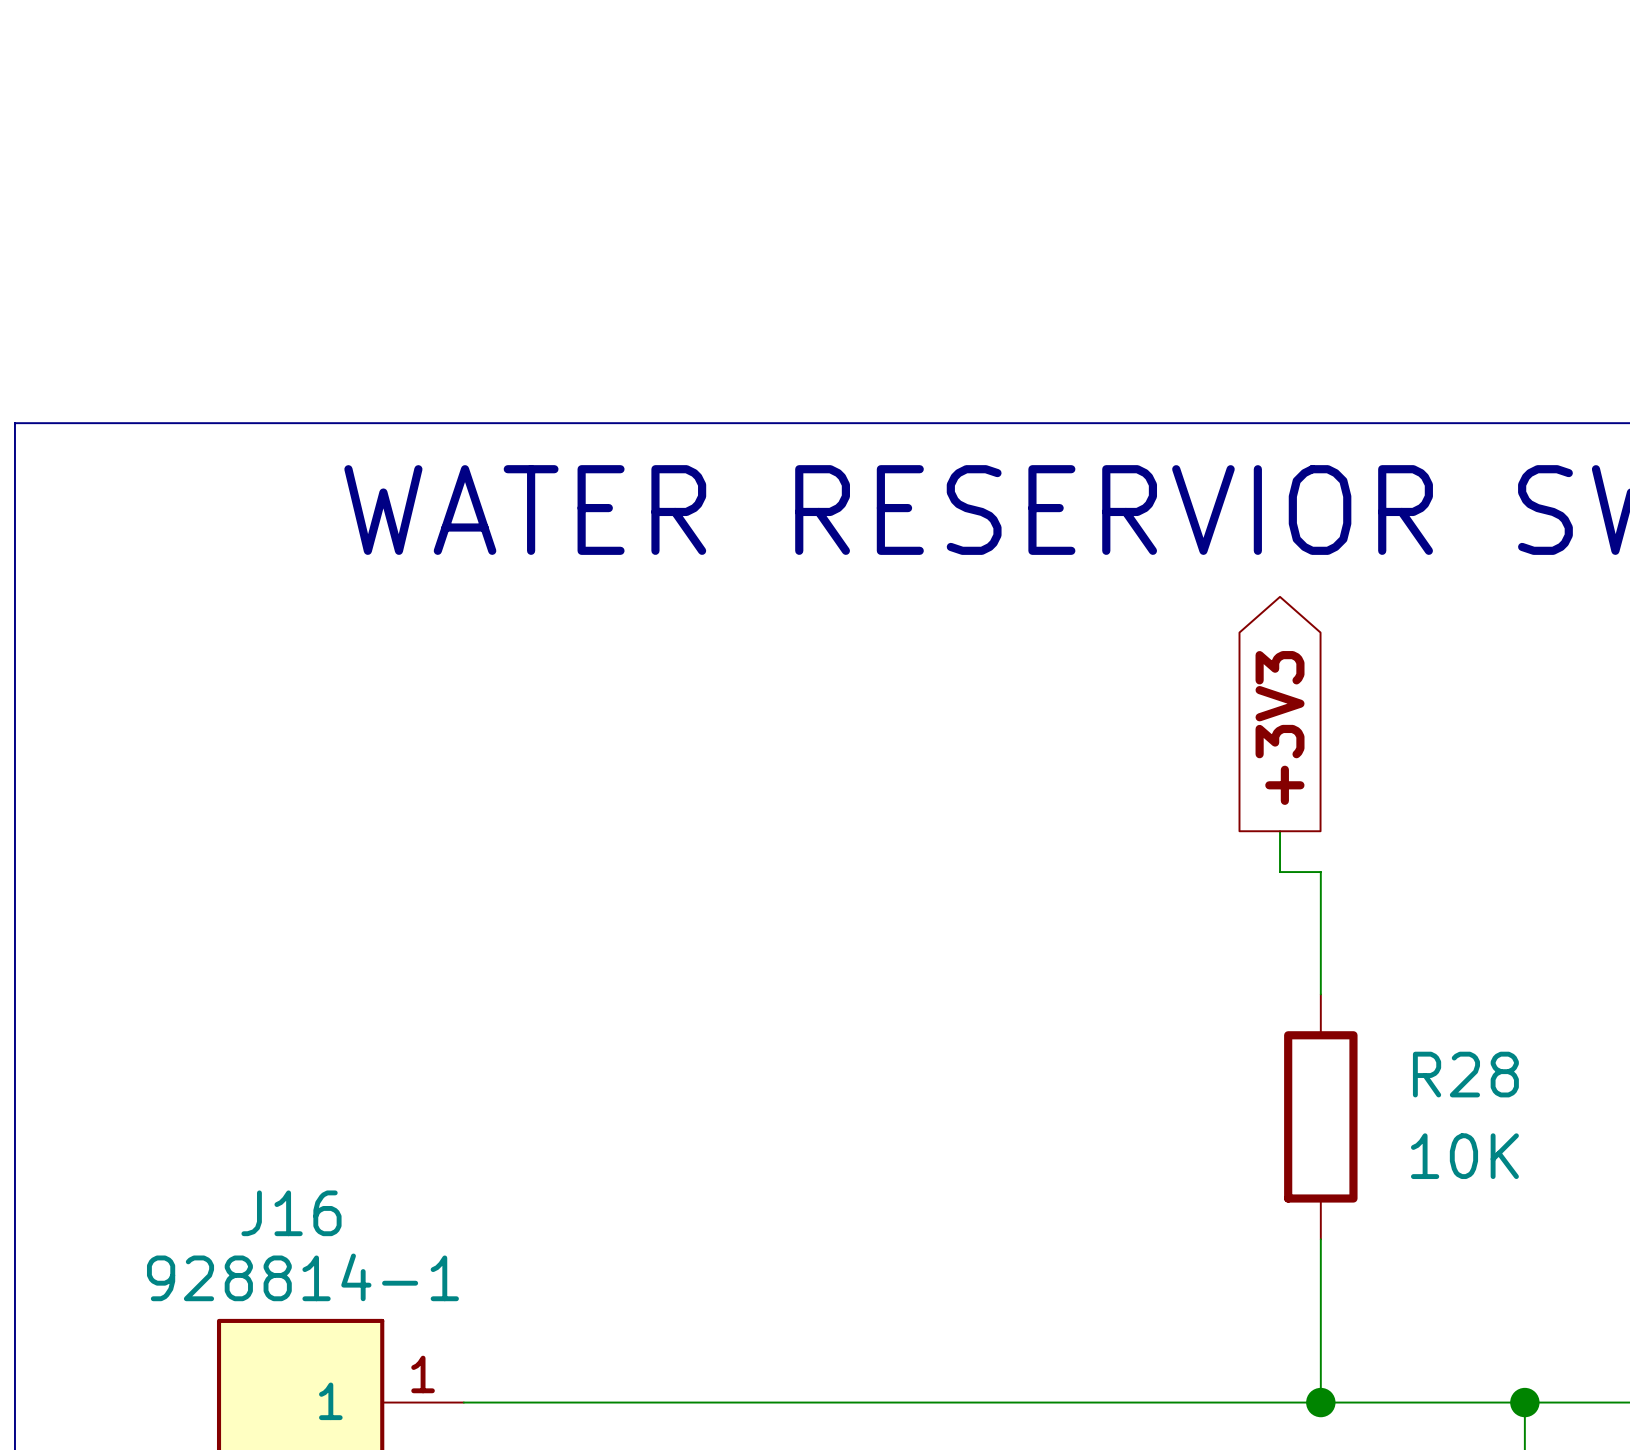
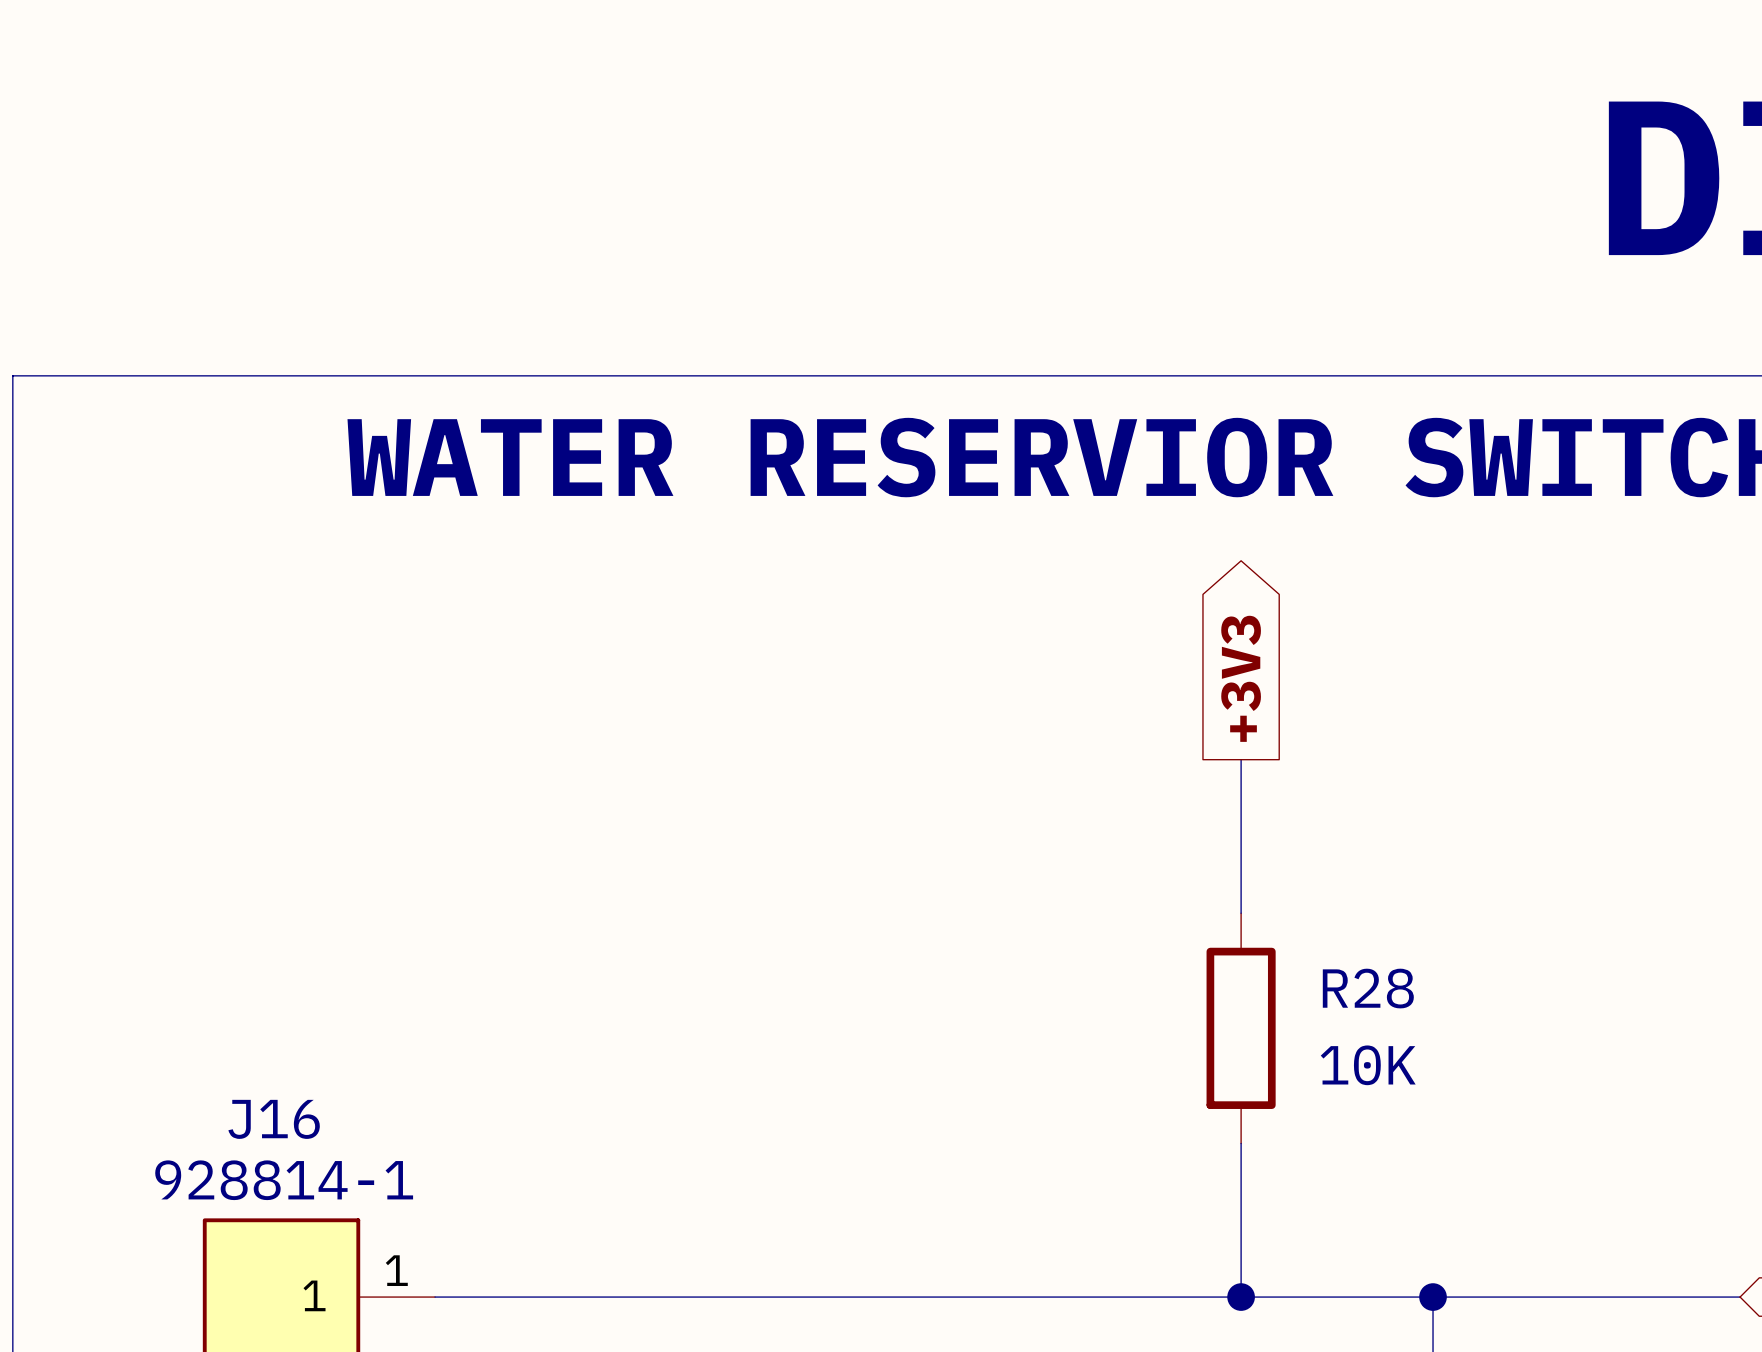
global label position: +3V3 (1280, 727) -> +3V3 (1241, 678)
wire: (1280, 831) (1280, 872) (1320, 872) -> (1241, 759) (1241, 798)

